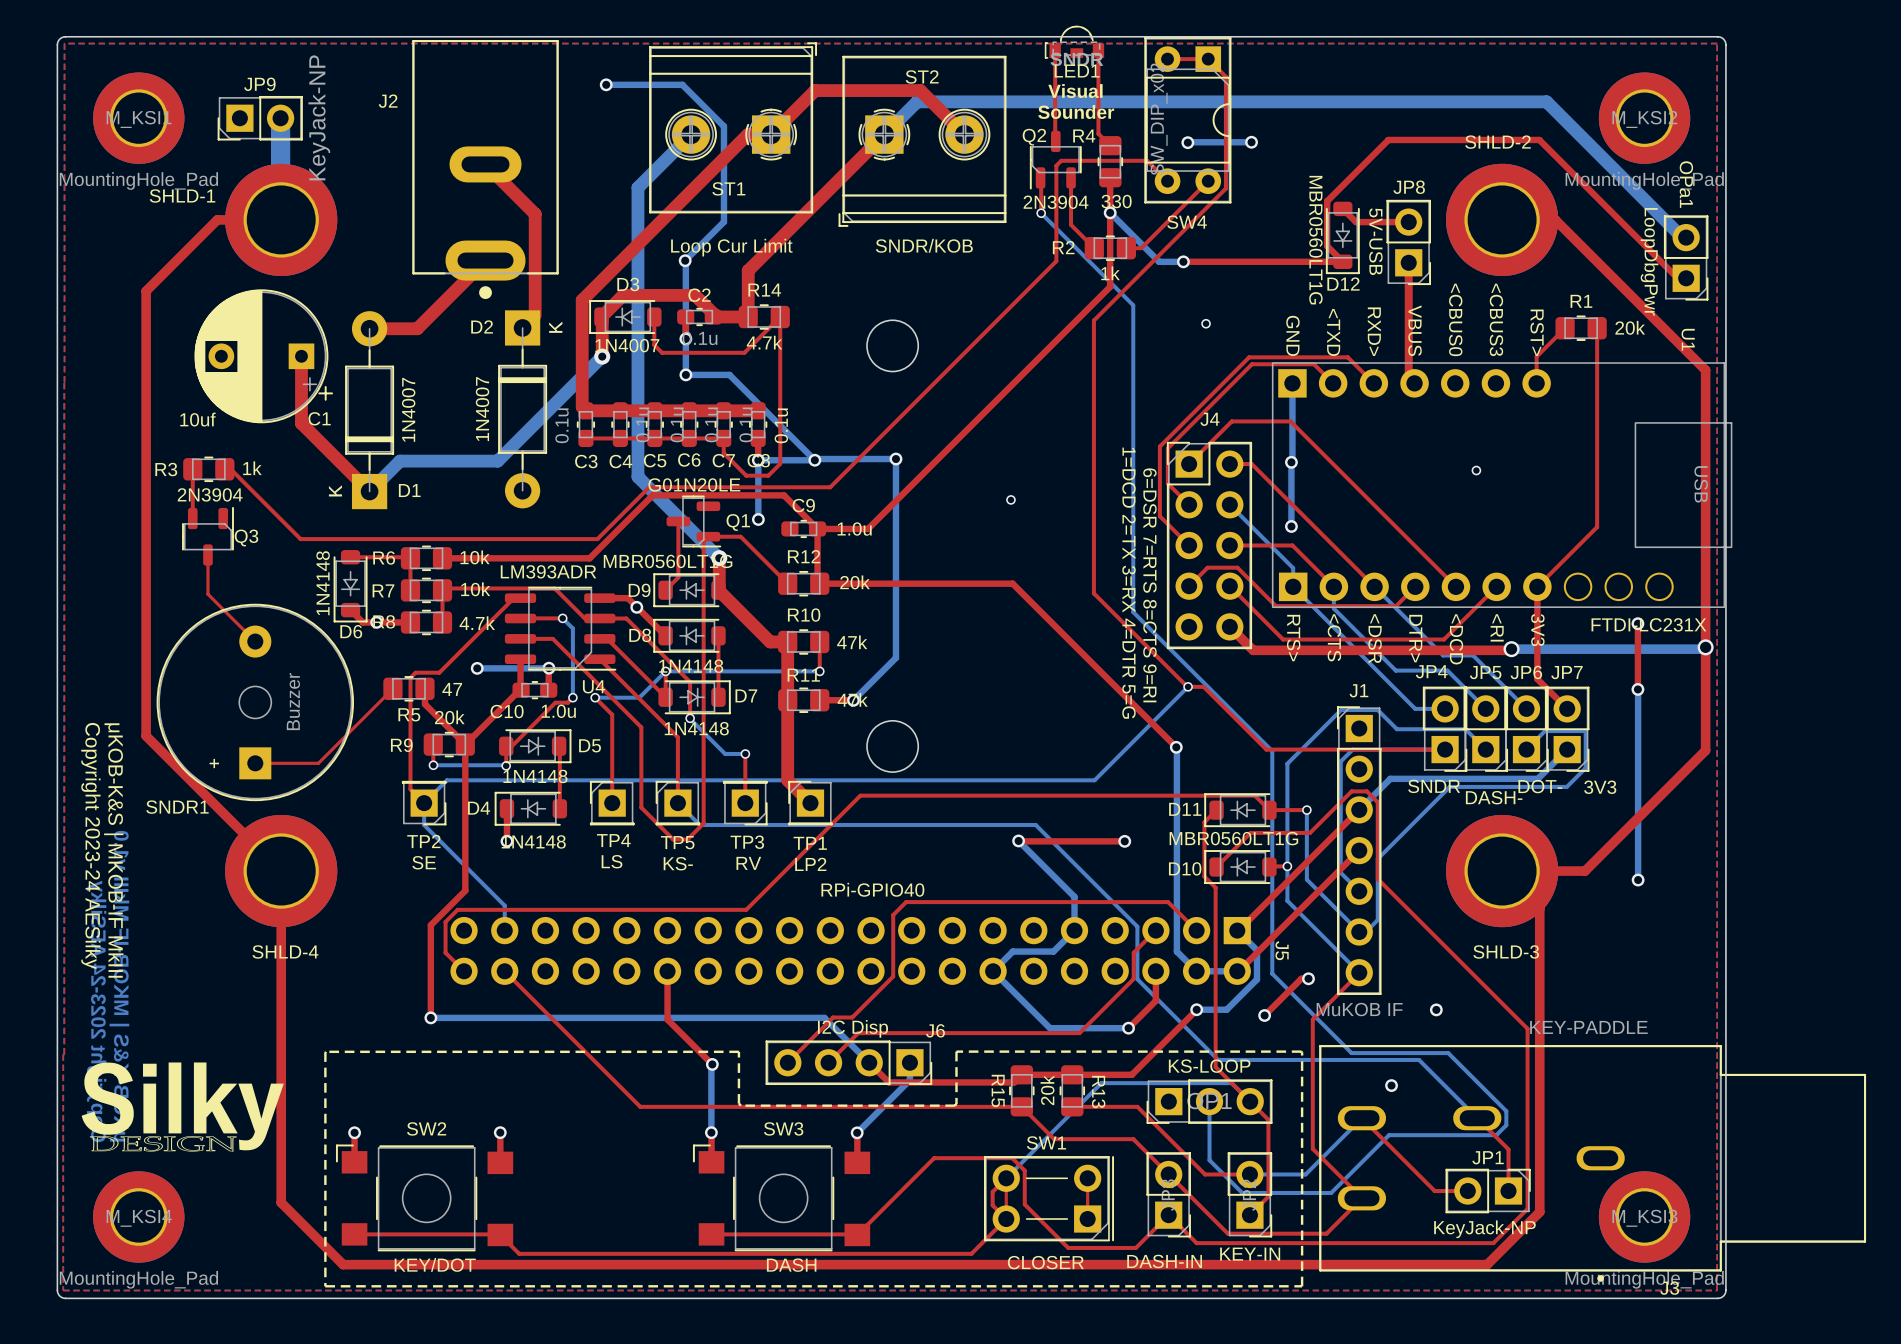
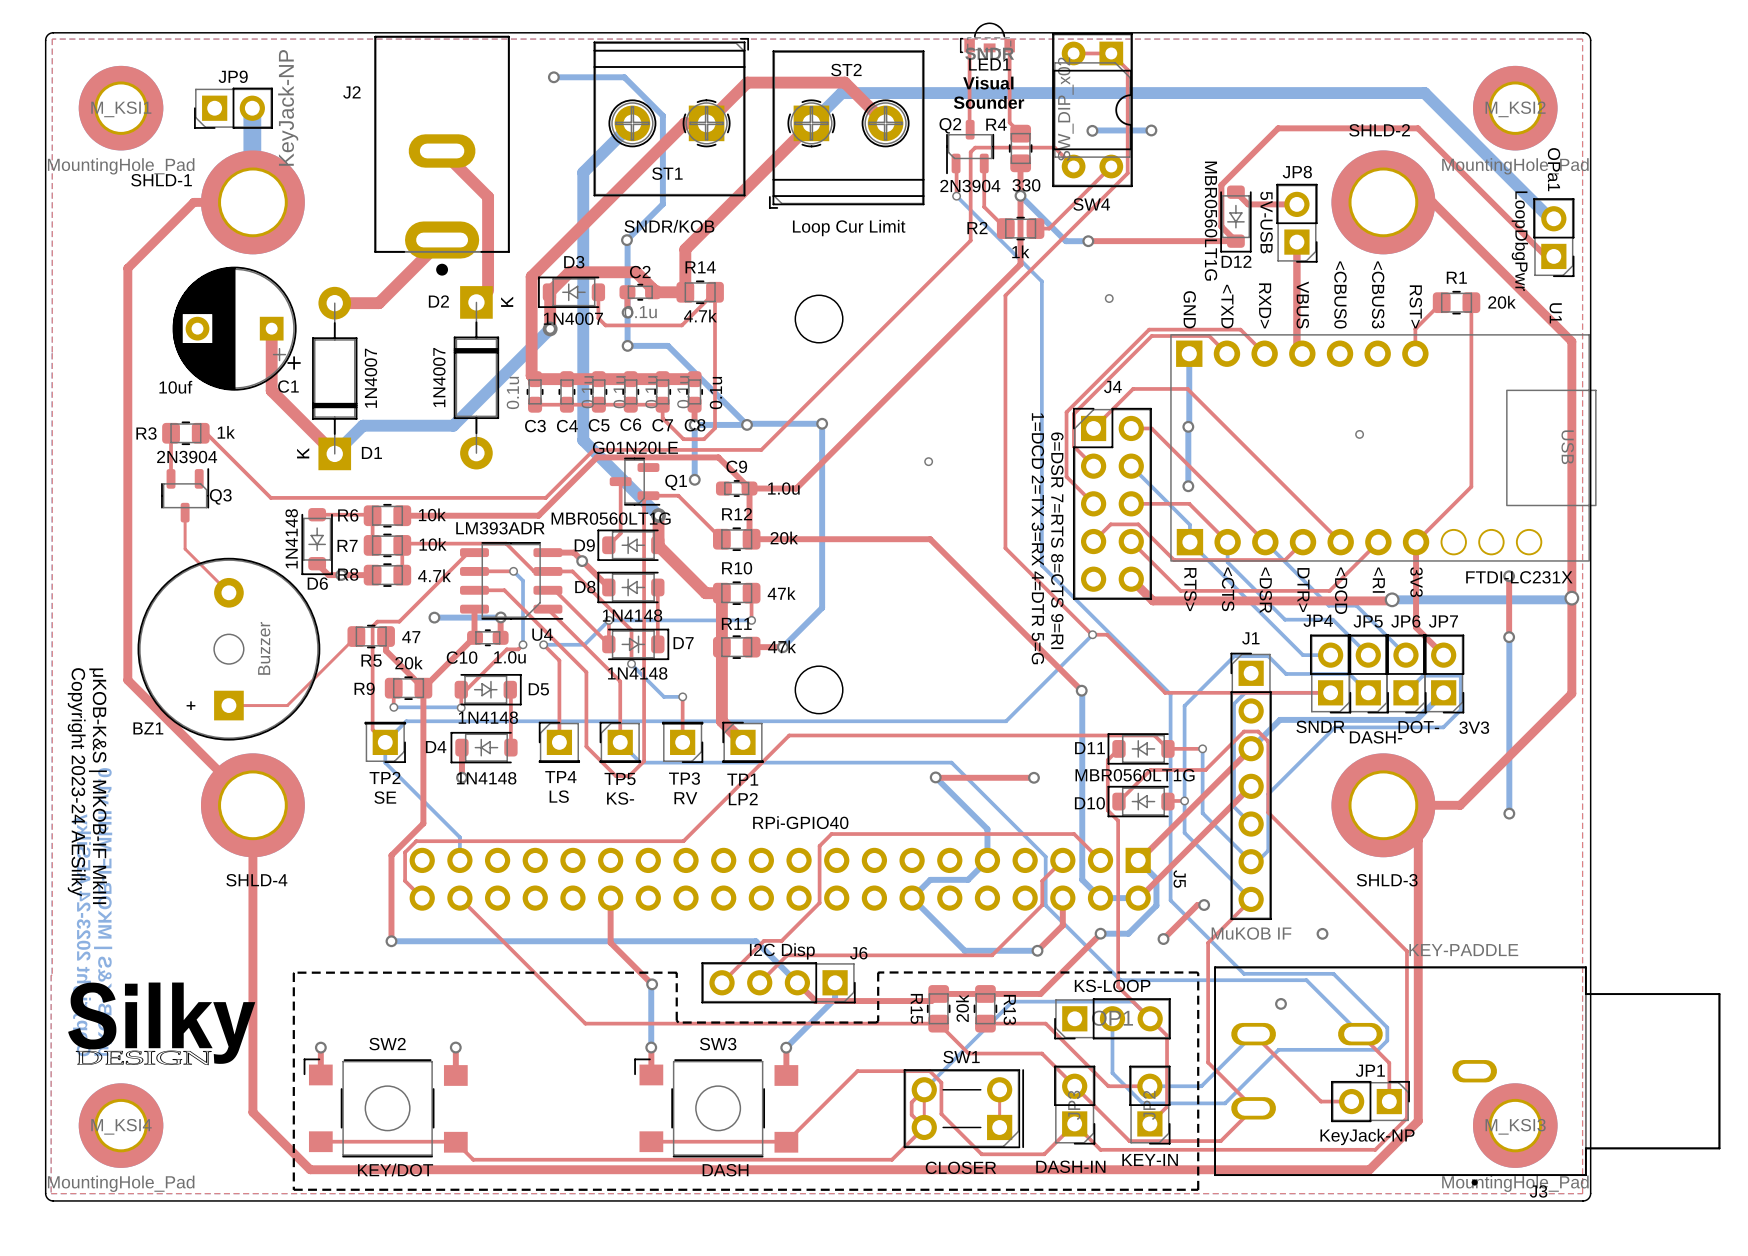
ST2 value: SNDR/KOB (924, 245) -> Loop Cur Limit (849, 228)
ST1 value: Loop Cur Limit (731, 247) -> SNDR/KOB (669, 226)
SNDR1 name: SNDR1 (177, 807) -> BZ1 (148, 728)

